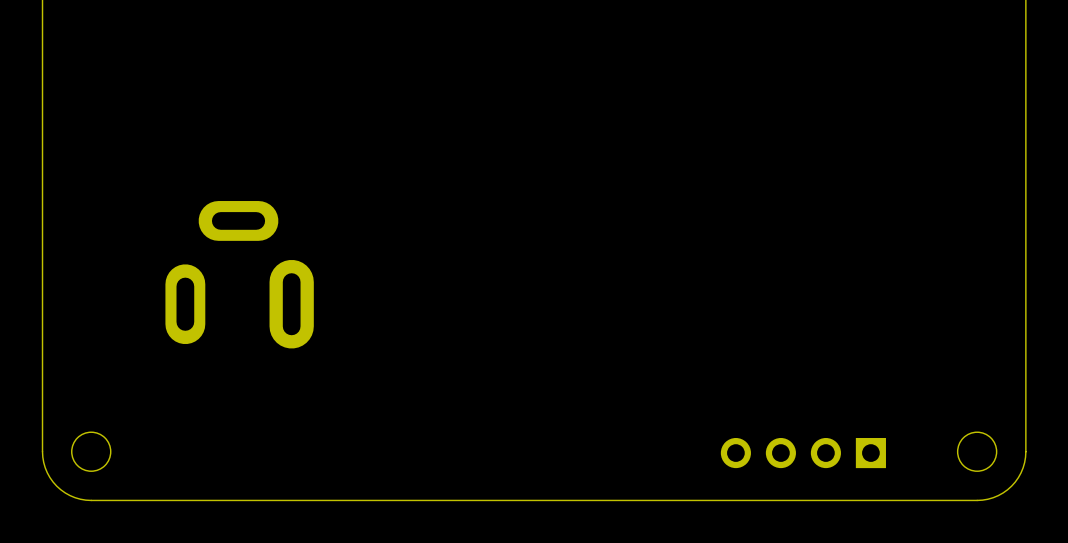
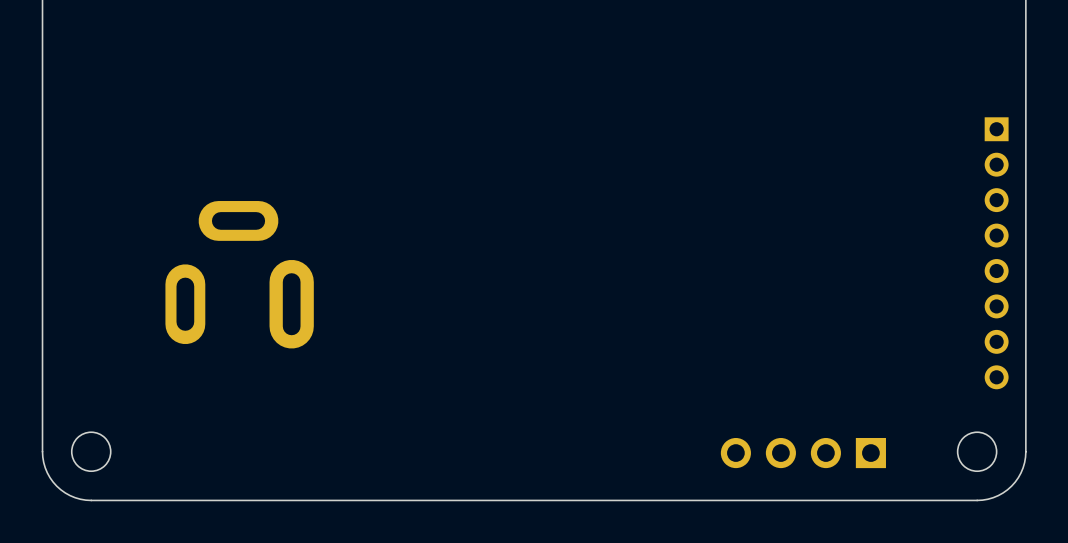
part: none -> (996, 253)

